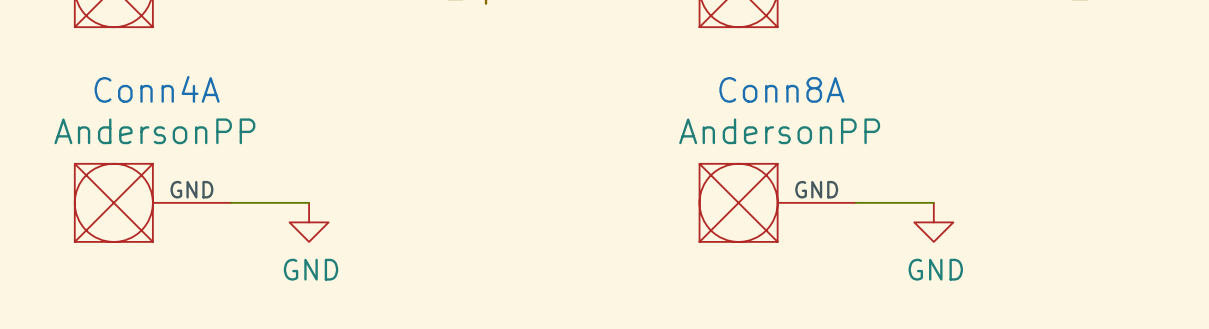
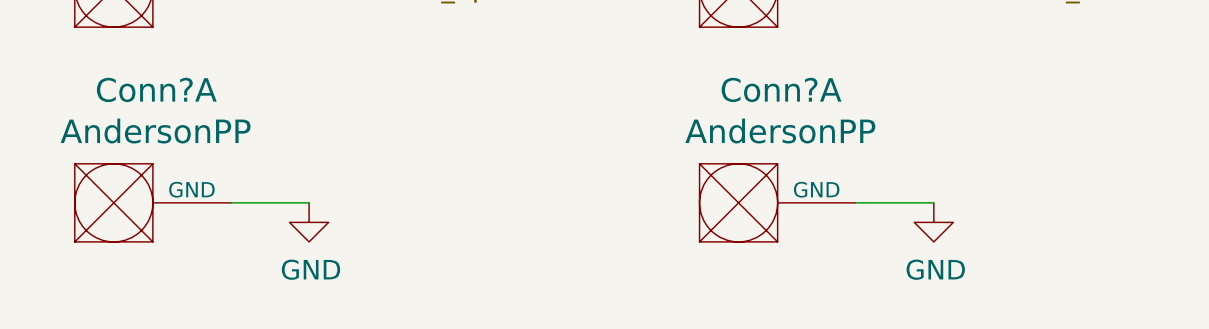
Conn4A name: Conn4A (157, 89) -> Conn?A (156, 89)
Conn8A name: Conn8A (781, 89) -> Conn?A (781, 89)

